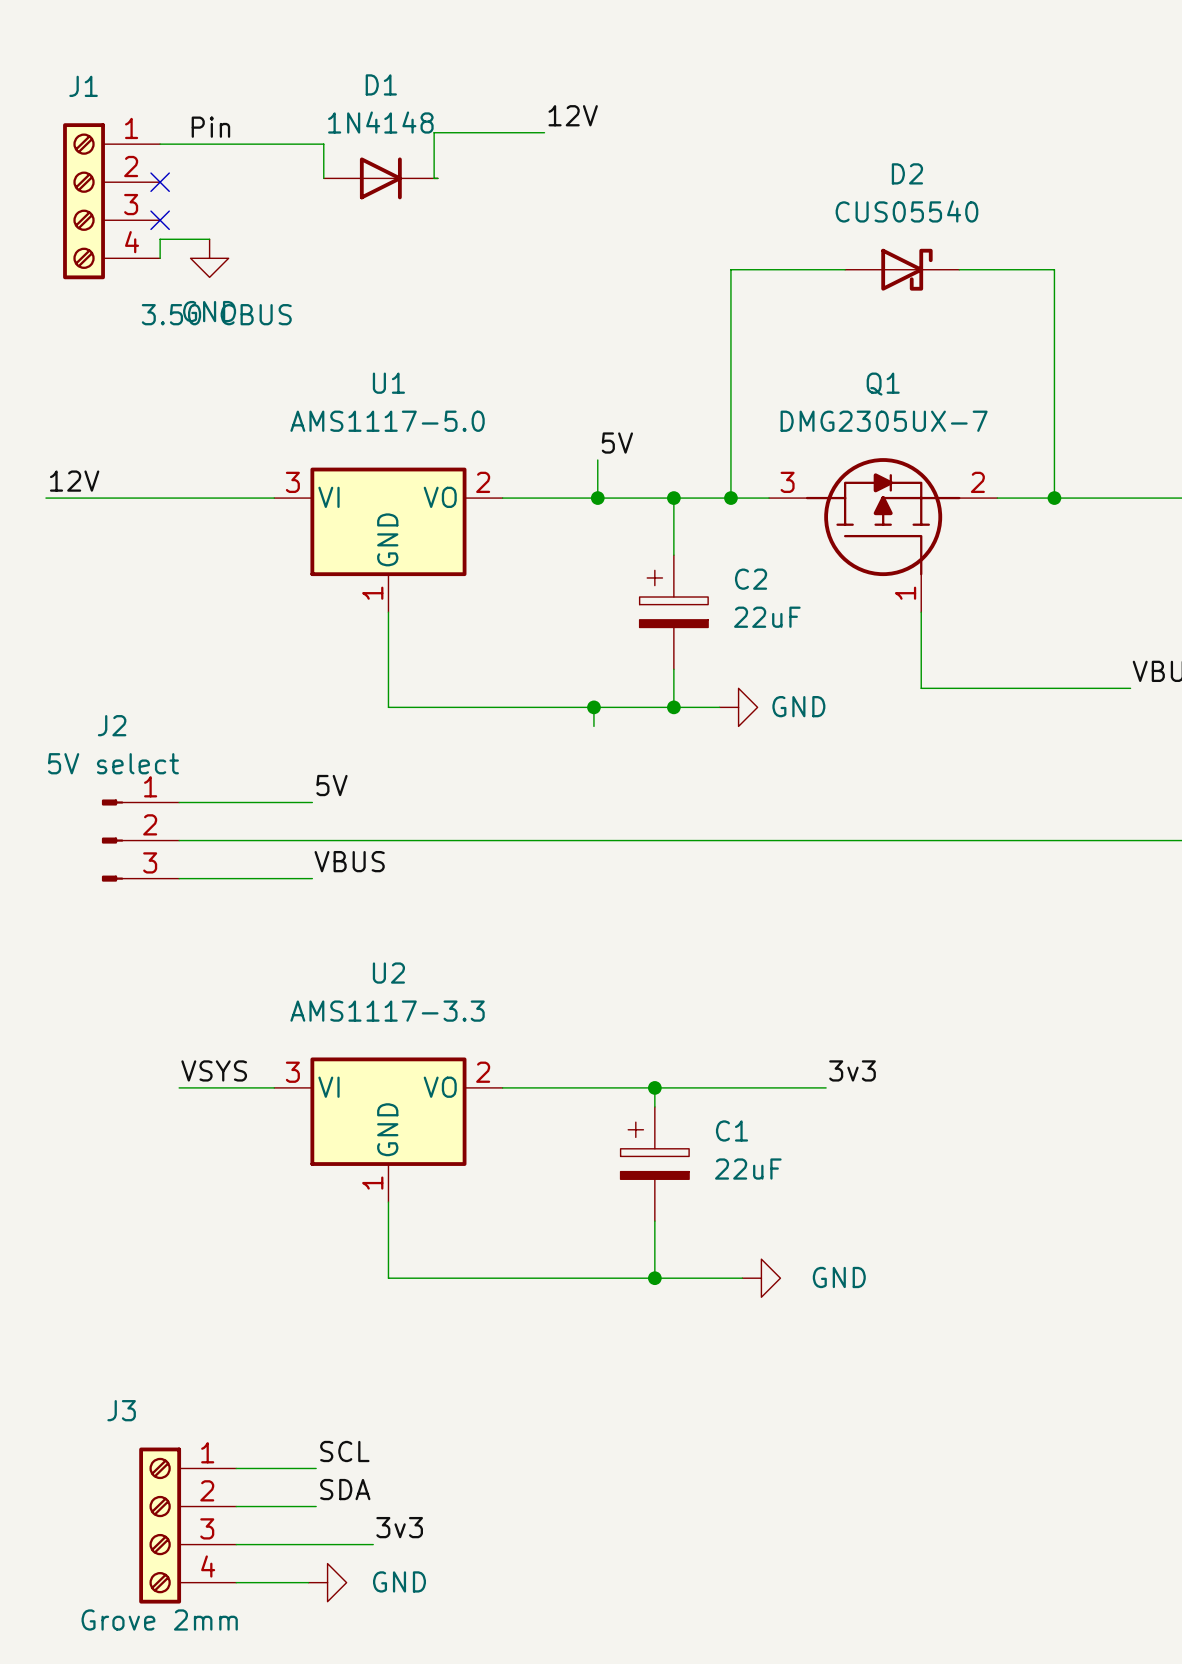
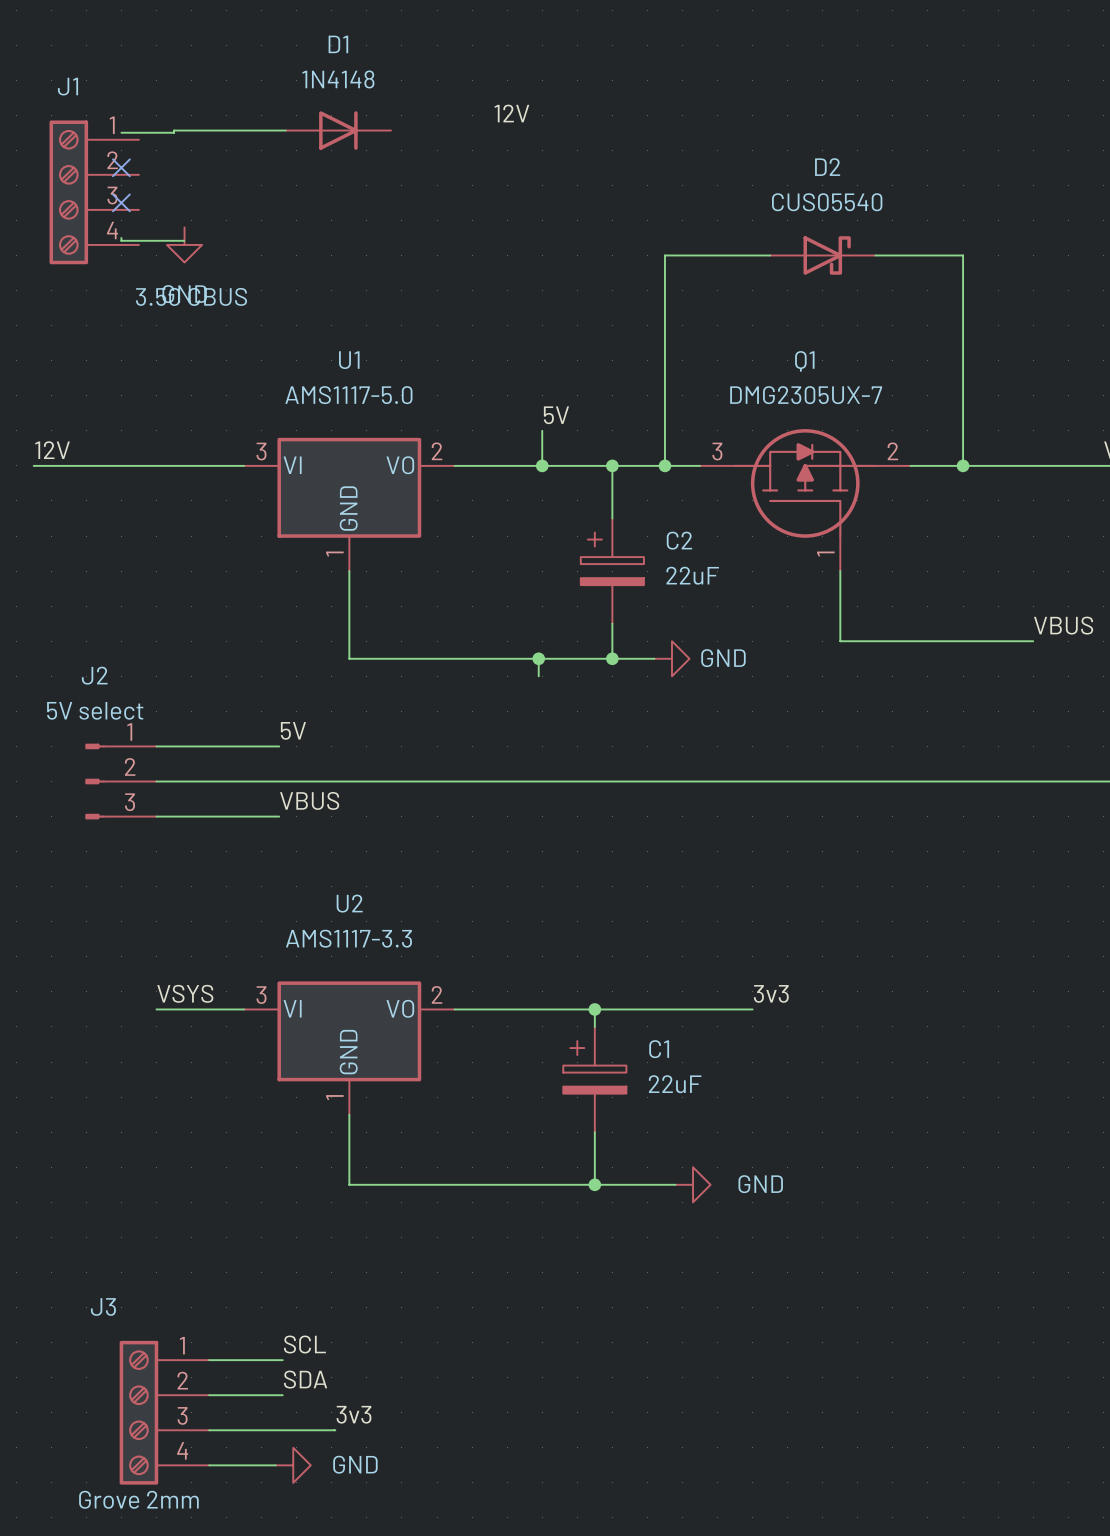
label: Pin (210, 127) -> none
wire: (544, 132) (434, 132) (434, 178) (437, 178) -> none
wire: none -> (285, 130) (121, 132)
wire: (160, 144) (323, 144) (323, 178) -> none
no-connect mark: none -> (121, 167)
D1 position: (380, 178) -> (338, 130)
no-connect mark: (160, 182) -> none
no-connect mark: none -> (121, 202)
no-connect mark: (160, 220) -> none
wire: (209, 239) (160, 239) (160, 258) -> none
wire: none -> (121, 237) (121, 240) (184, 240)

